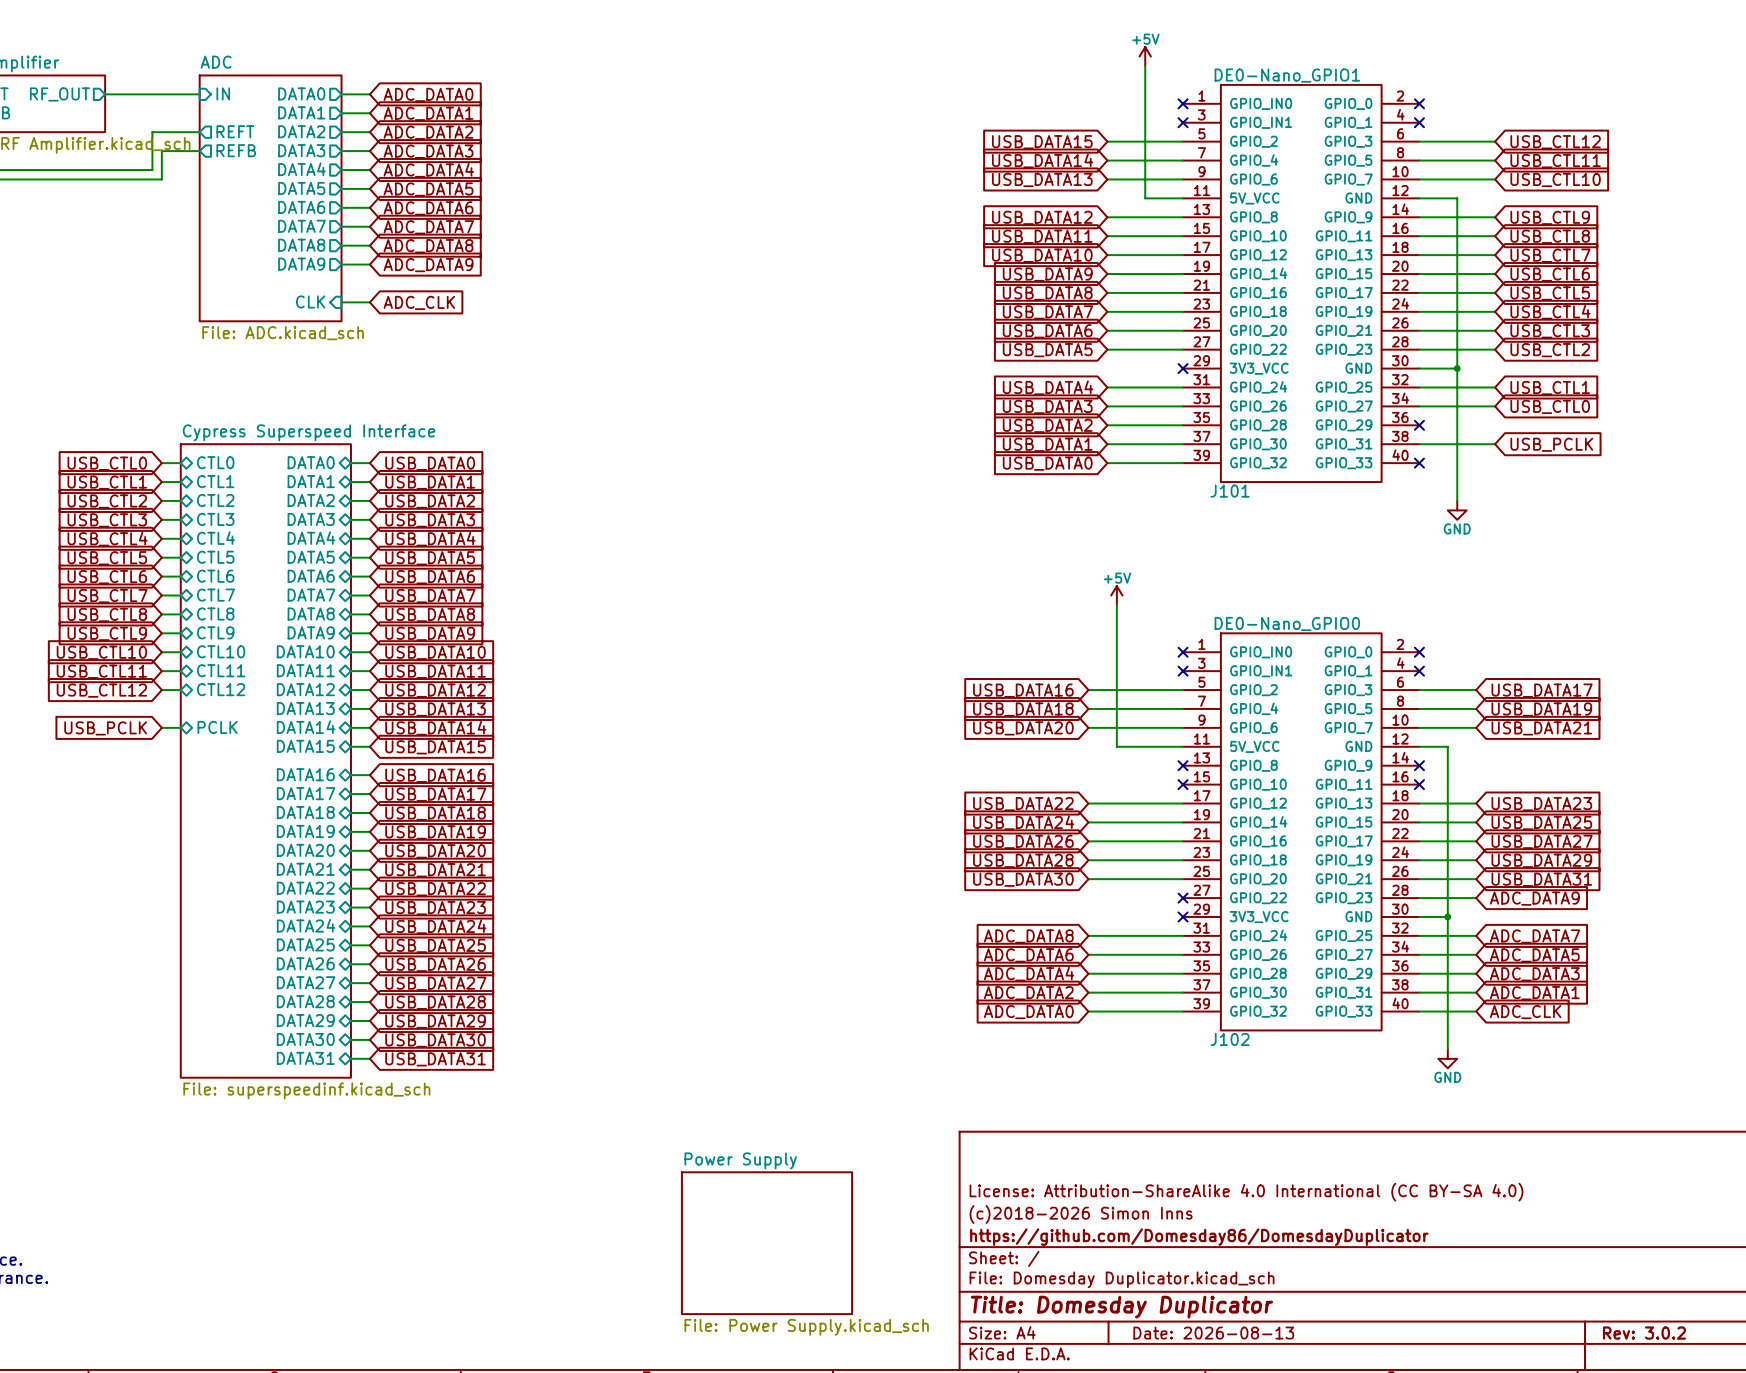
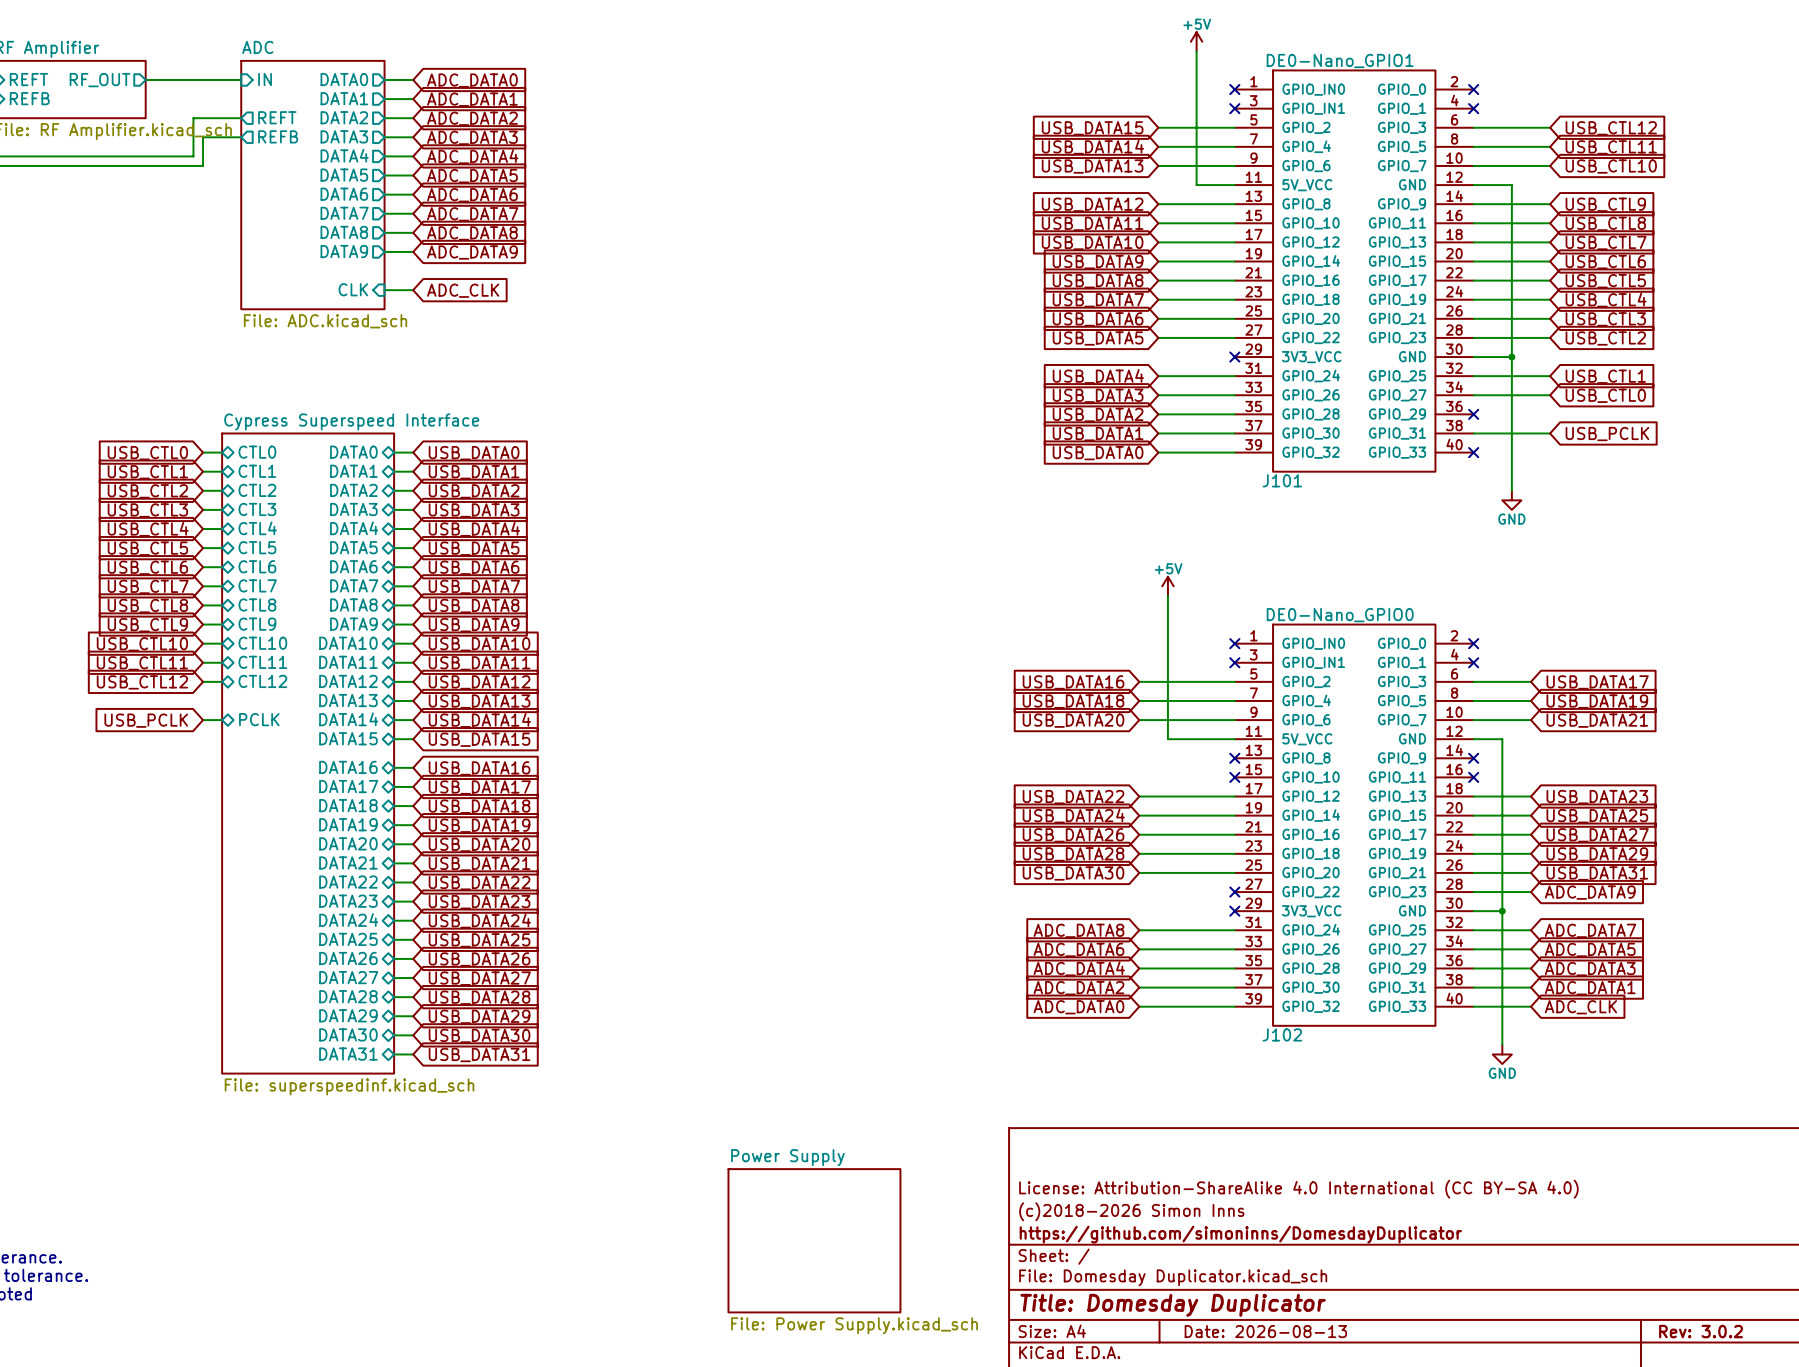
title block: https://github.com/Domesday86/DomesdayDuplicator (1199, 1237) -> https://github.com/simoninns/DomesdayDuplicator (1240, 1234)

